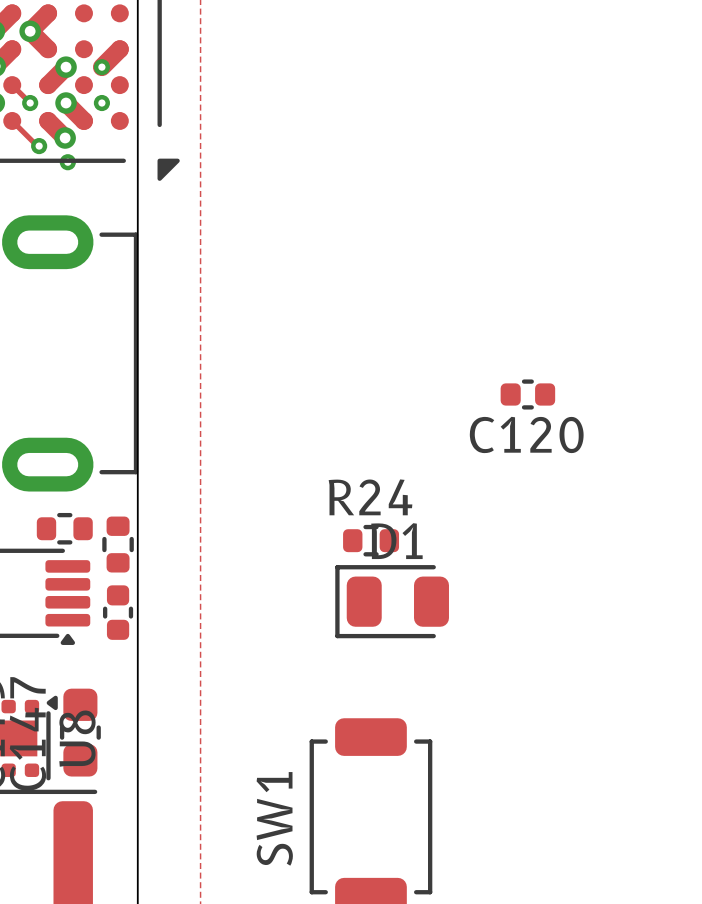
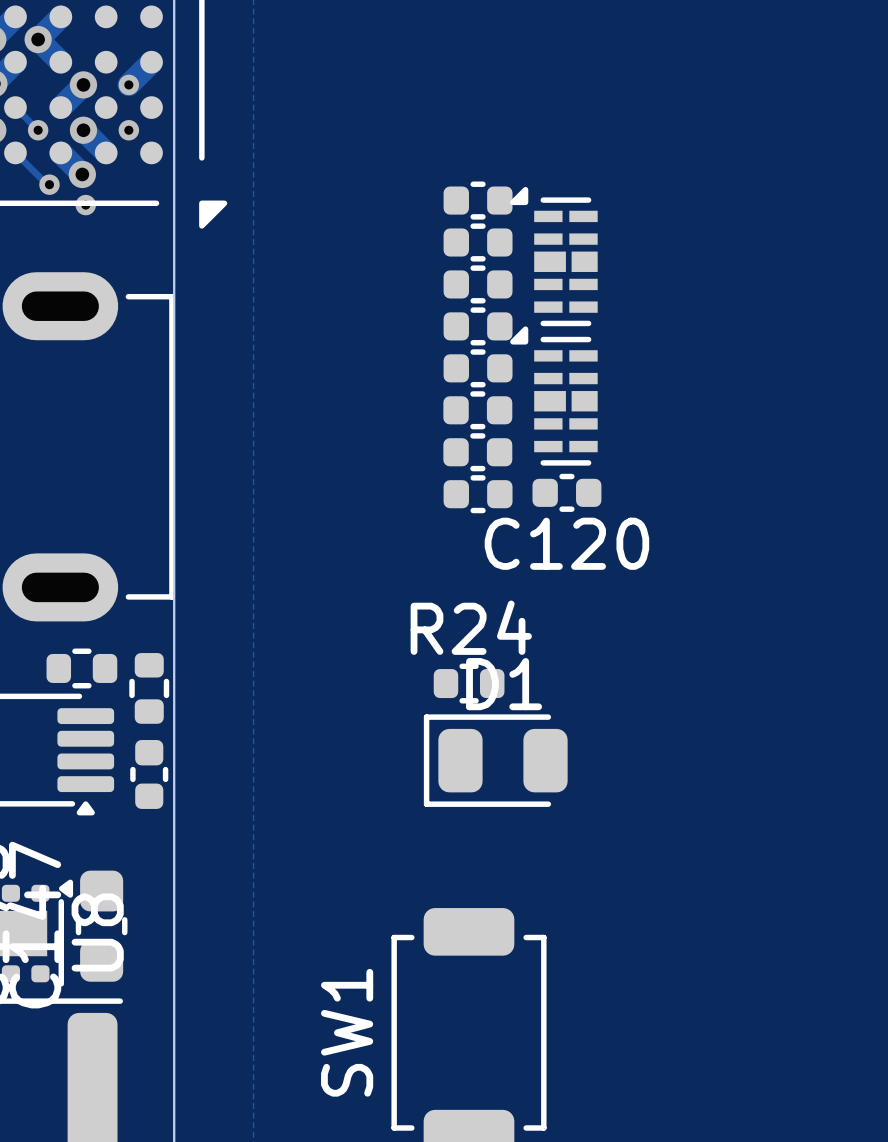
part: none -> (478, 200)
part: none -> (478, 242)
part: none -> (553, 256)
part: none -> (478, 284)
part: none -> (478, 326)
part: none -> (478, 368)
part: none -> (553, 396)
part: none -> (477, 410)
part: none -> (477, 452)
part: none -> (478, 494)
C120 position: (527, 394) -> (566, 492)

